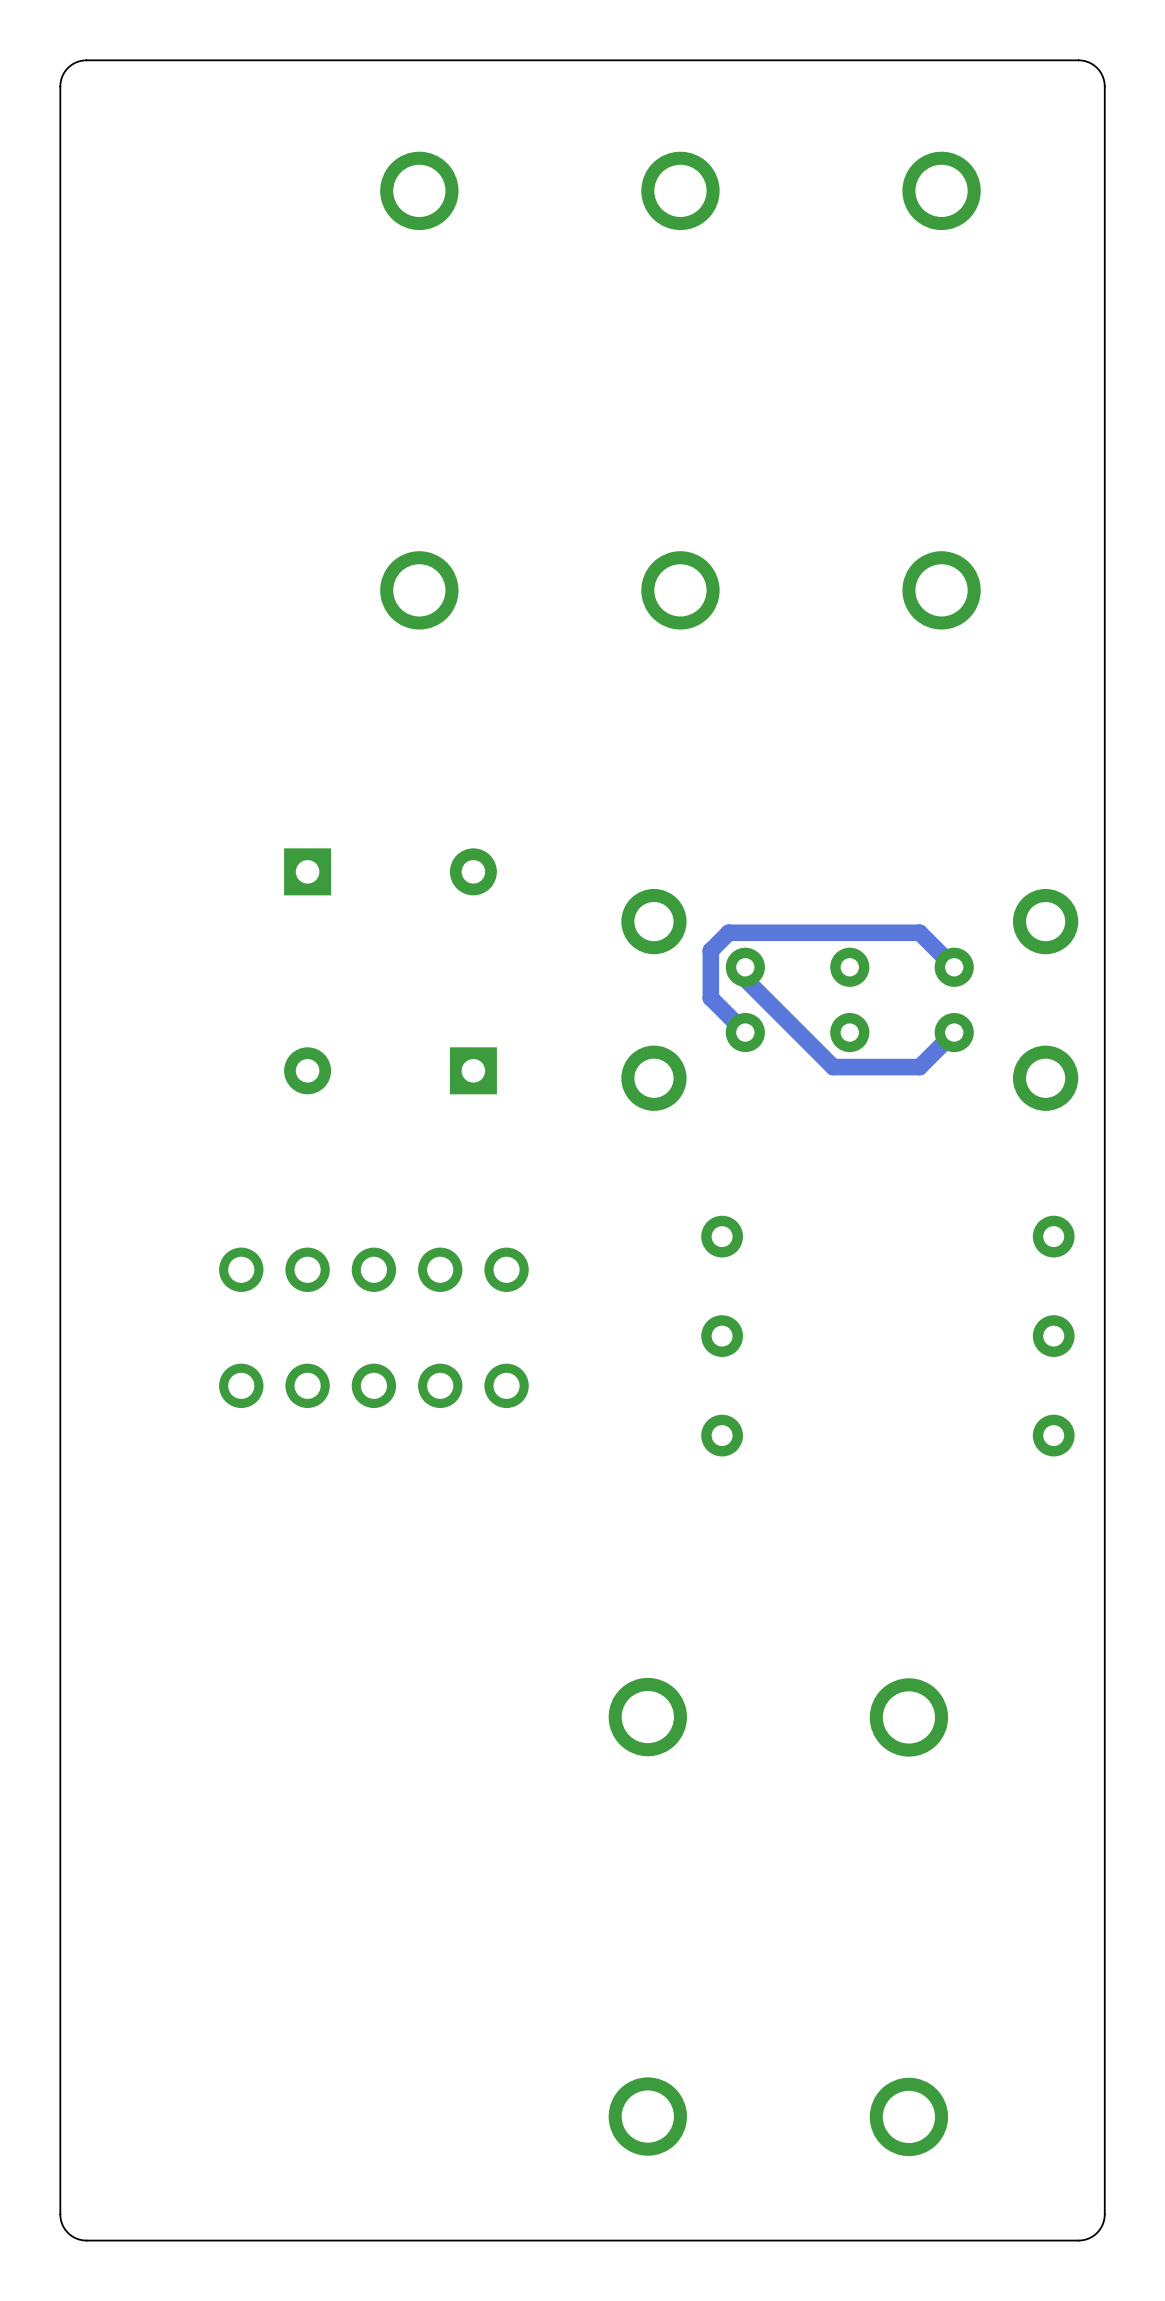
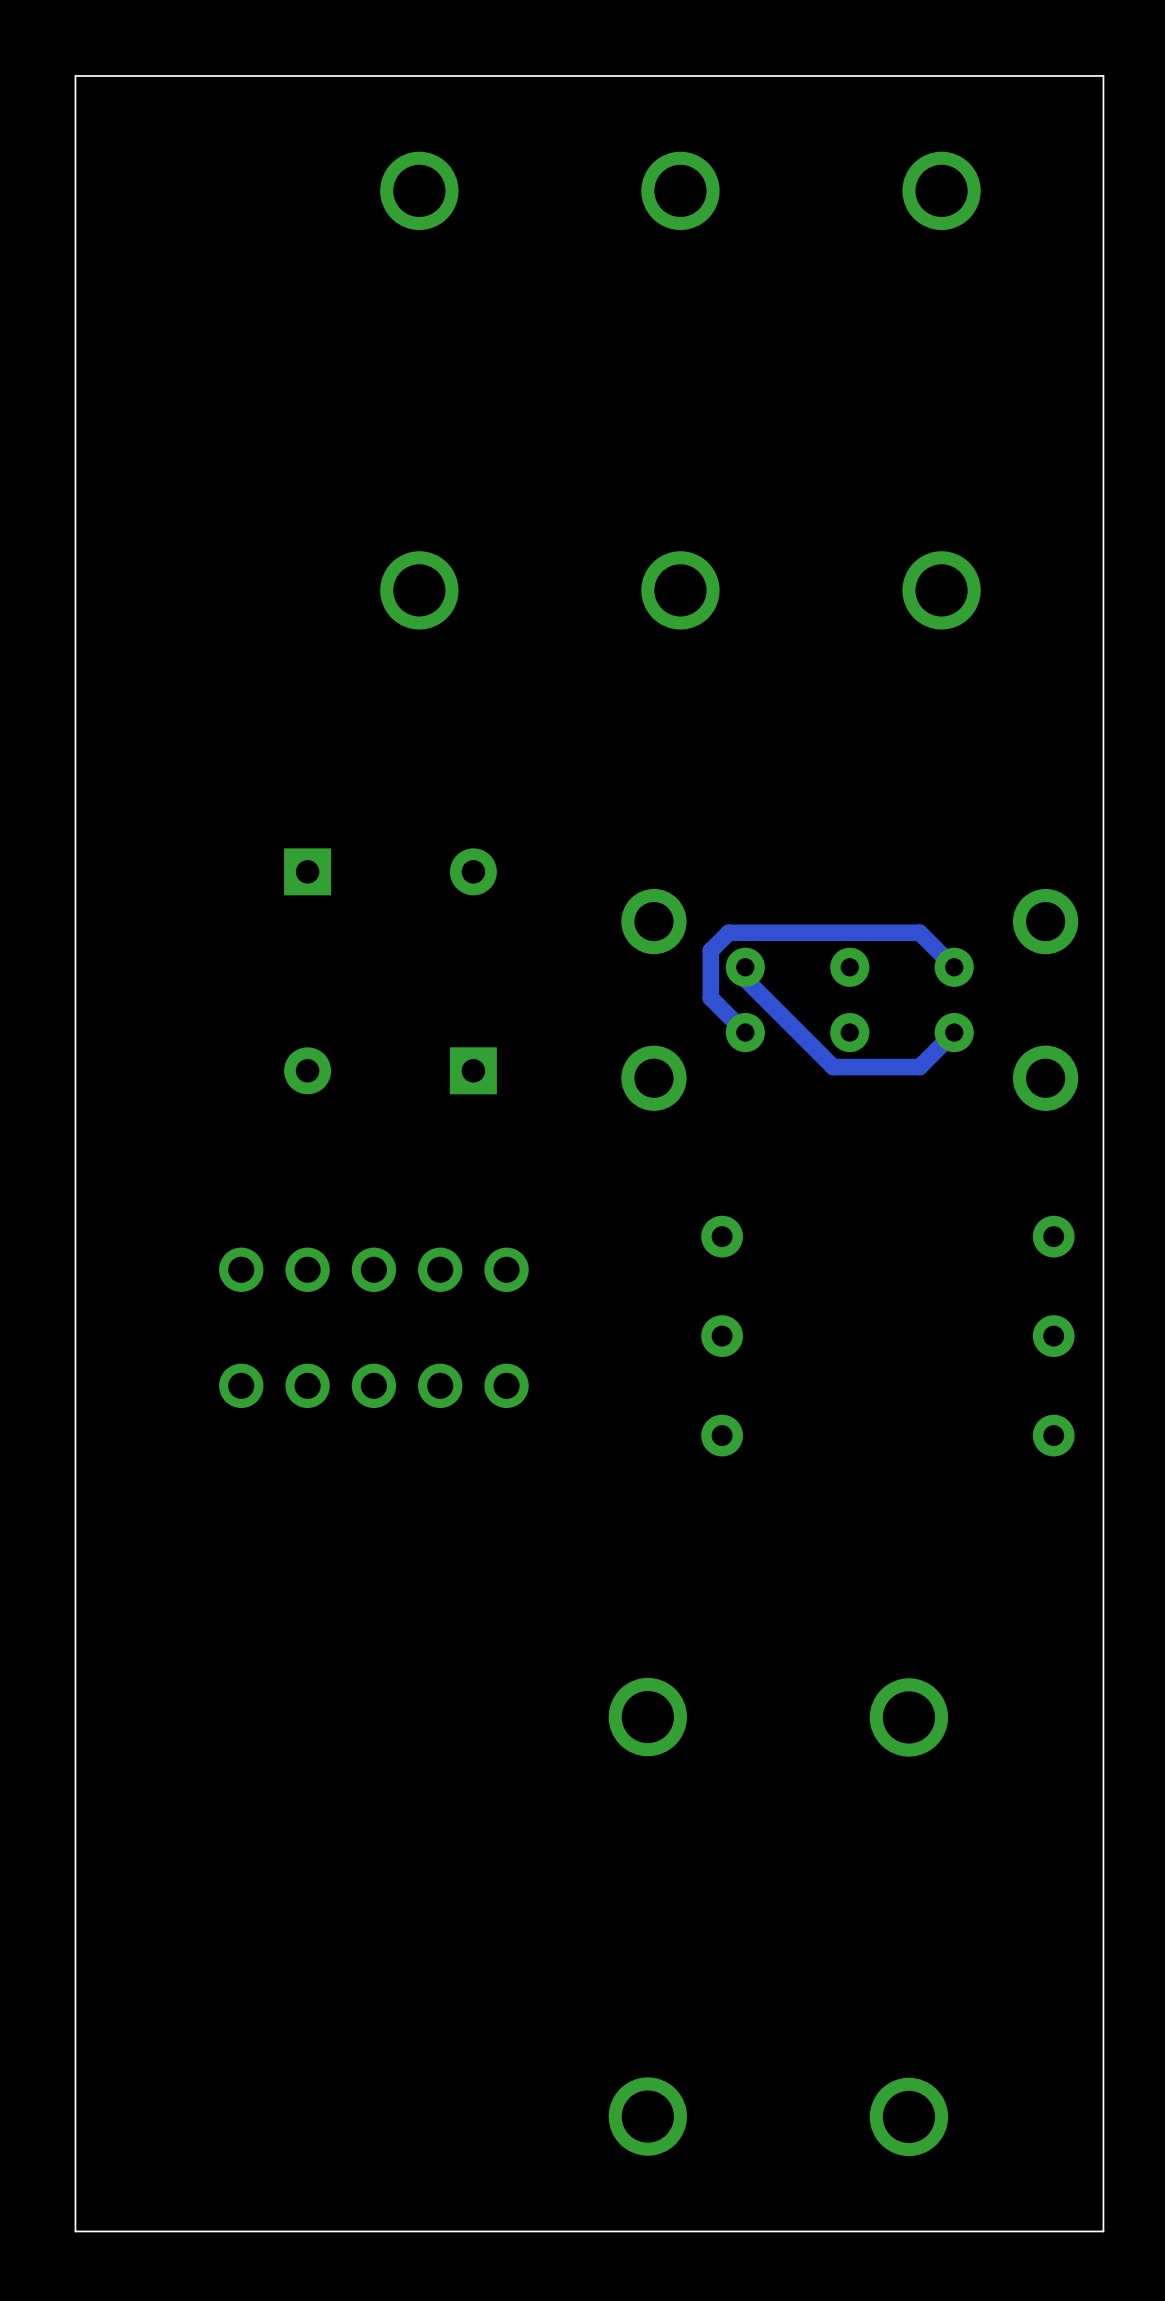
board edge: (1078, 60) (86, 60) (73, 63) (62, 76) (60, 86) (60, 2214) (65, 2230) (76, 2238) (86, 2240) (1078, 2240) (1094, 2235) (1102, 2224) (1104, 2214) (1104, 86) (1102, 76) (1097, 67) (1088, 62) (1078, 60) -> (1103, 75) (1103, 2231) (75, 2231) (75, 75) (1103, 75)

